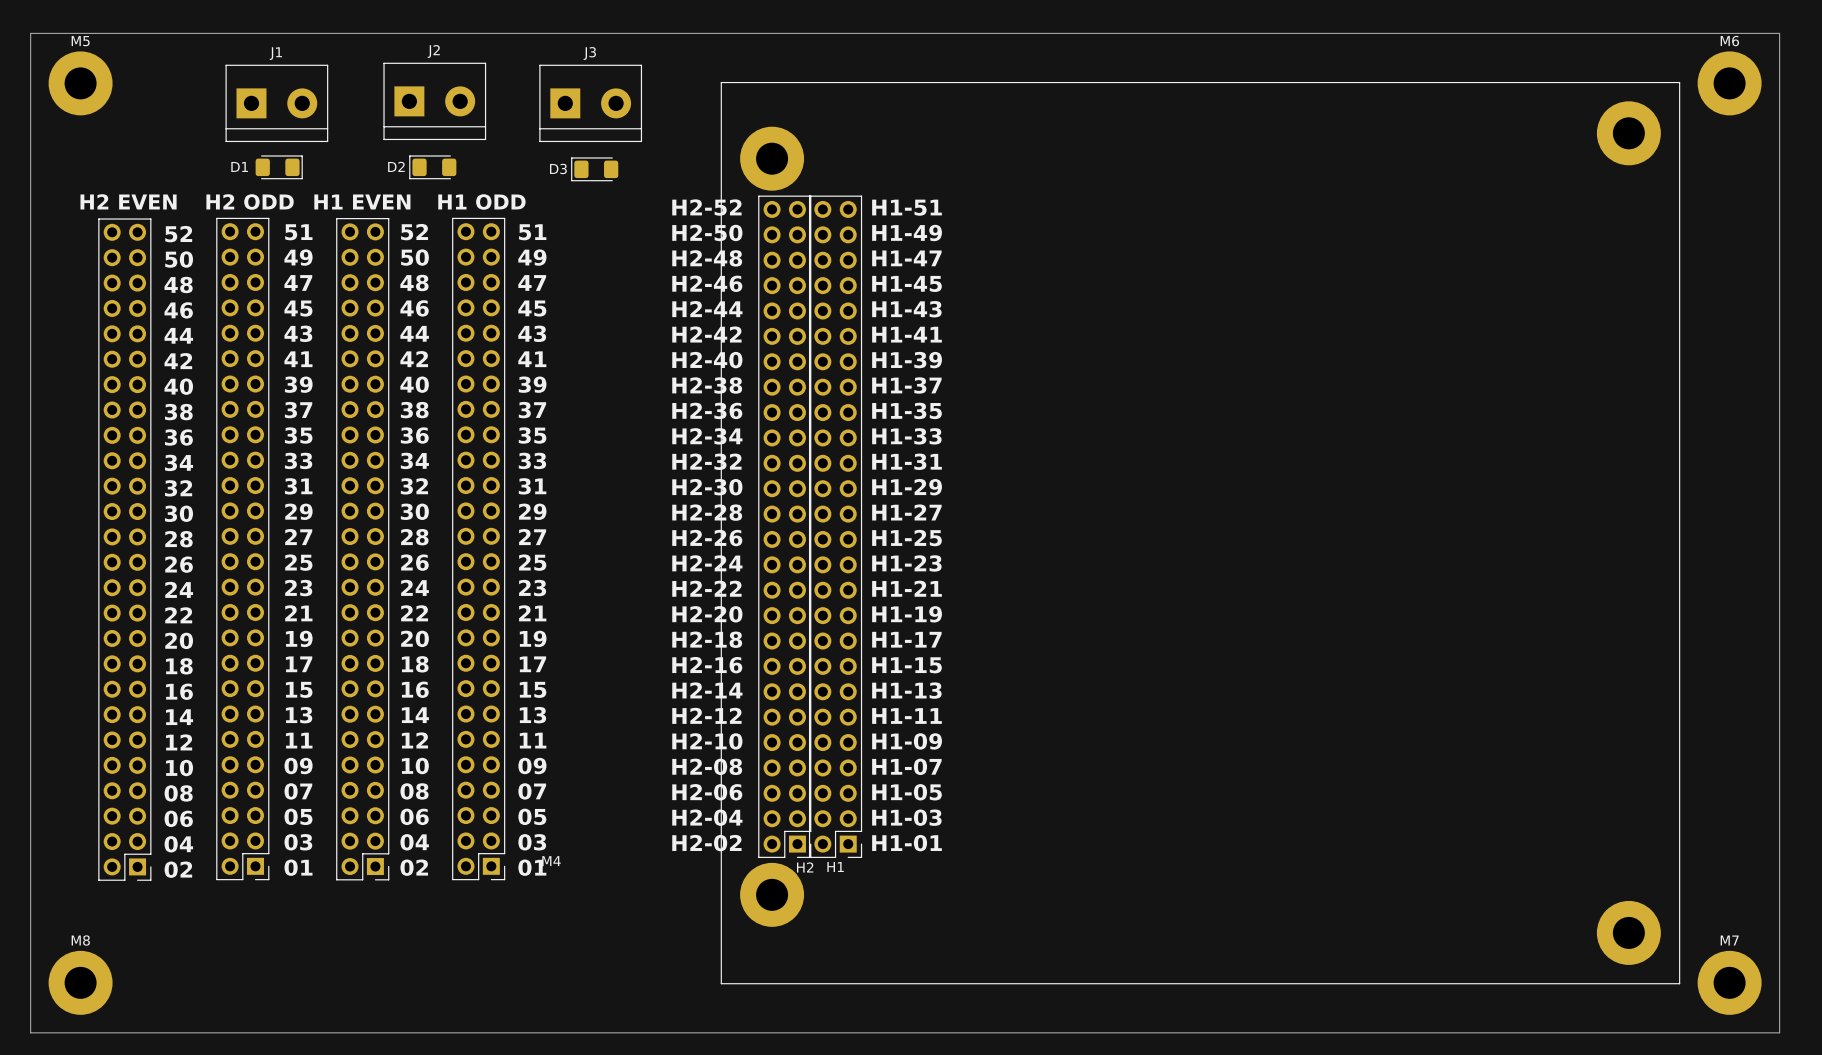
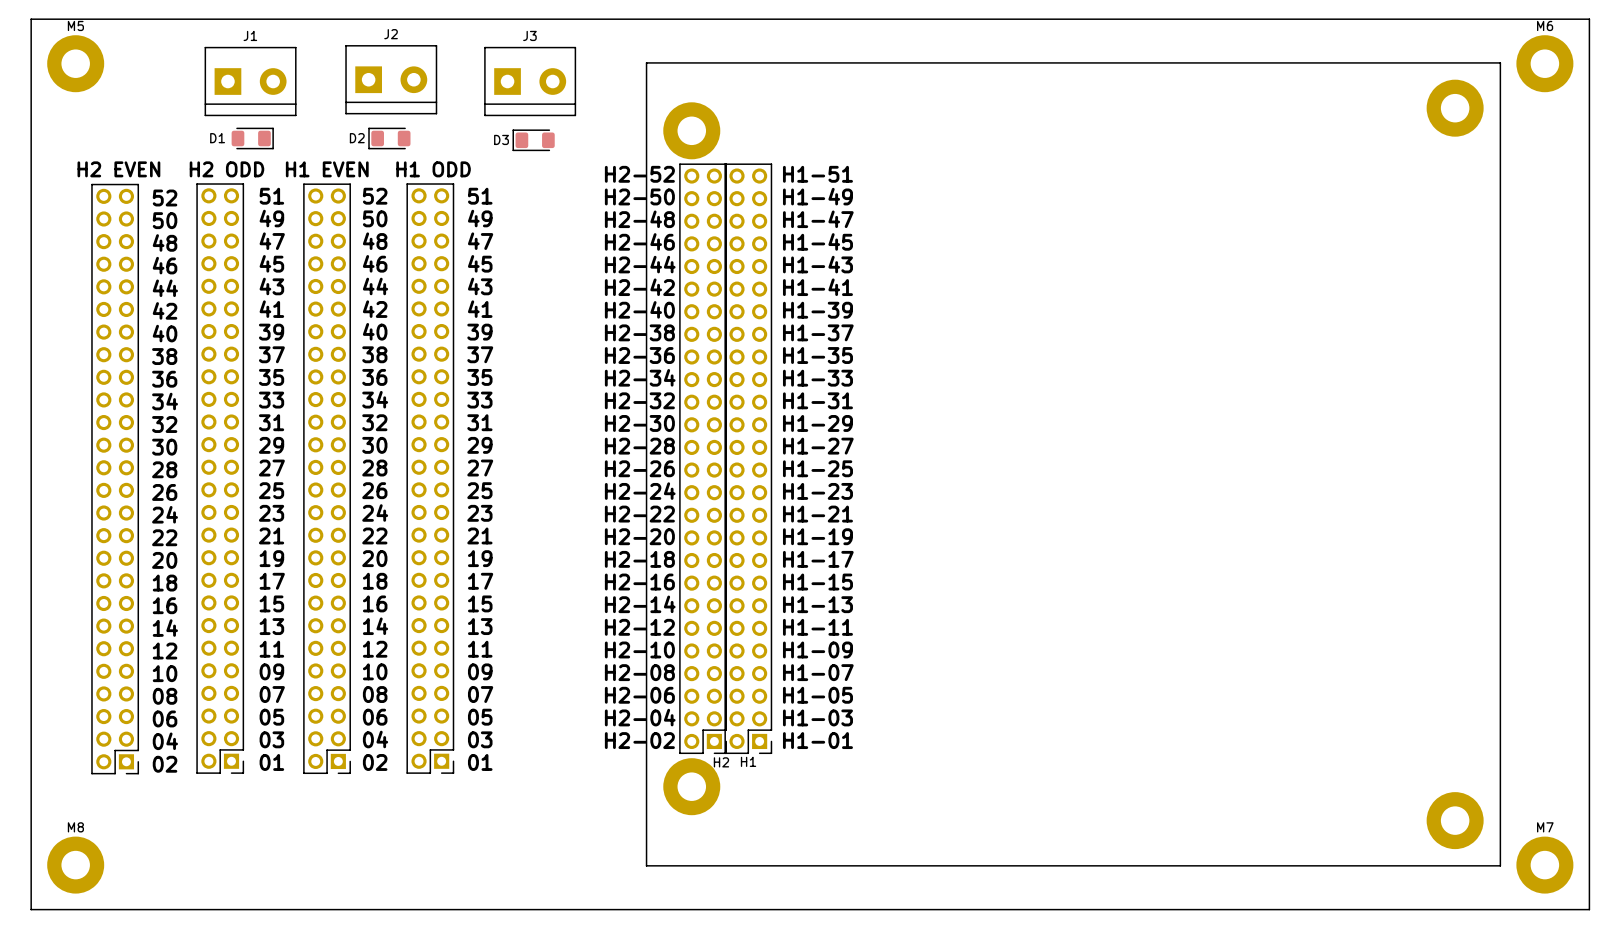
M4 name: M4 (551, 861) -> none

